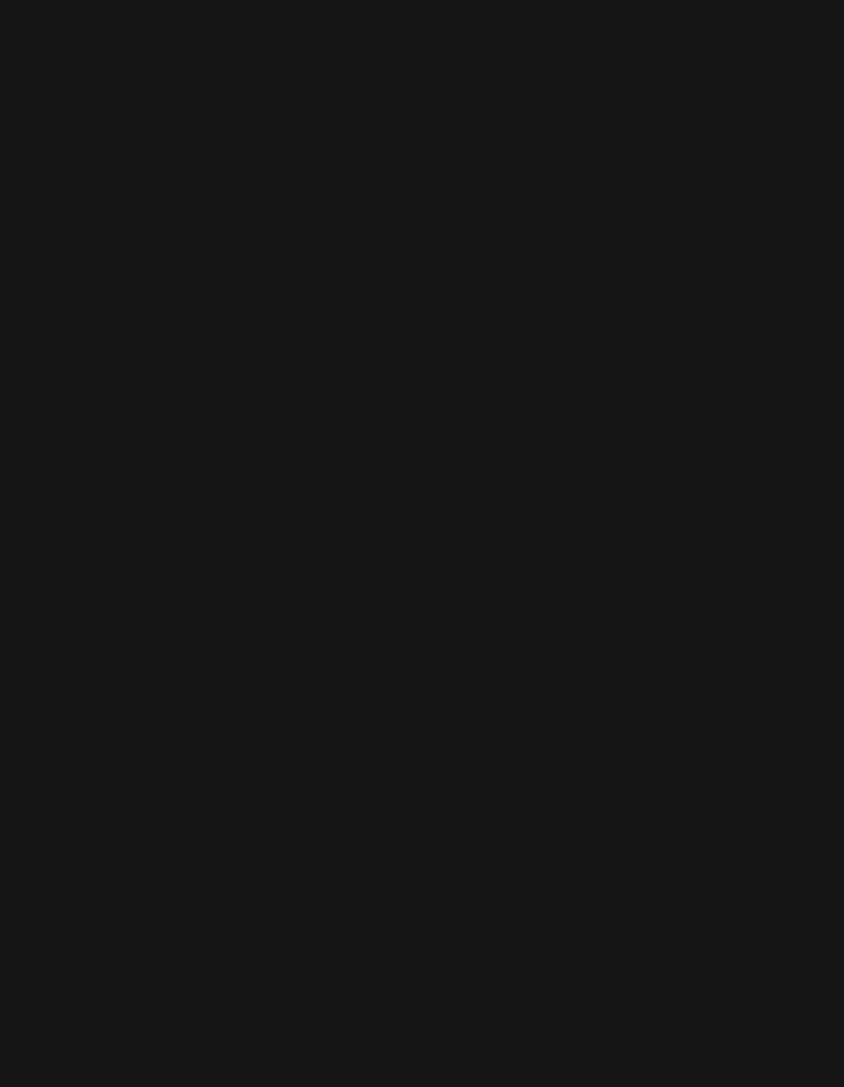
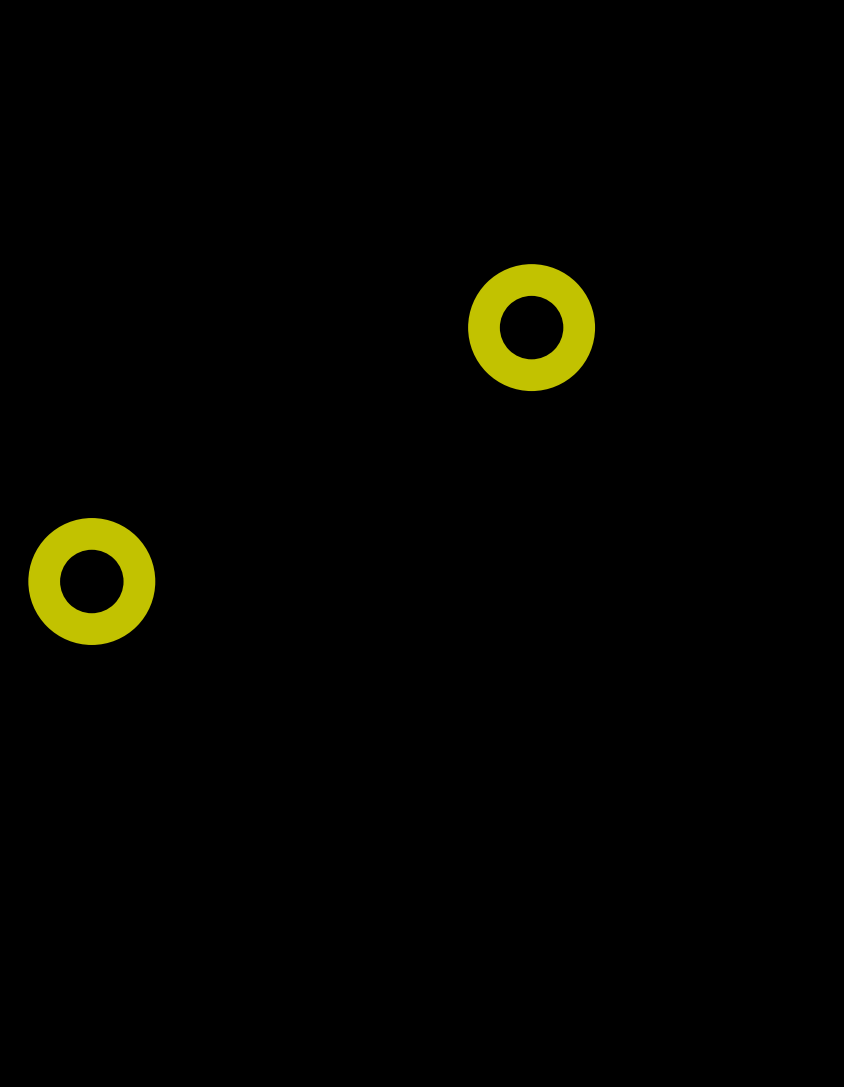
part: none -> (531, 327)
part: none -> (91, 581)

